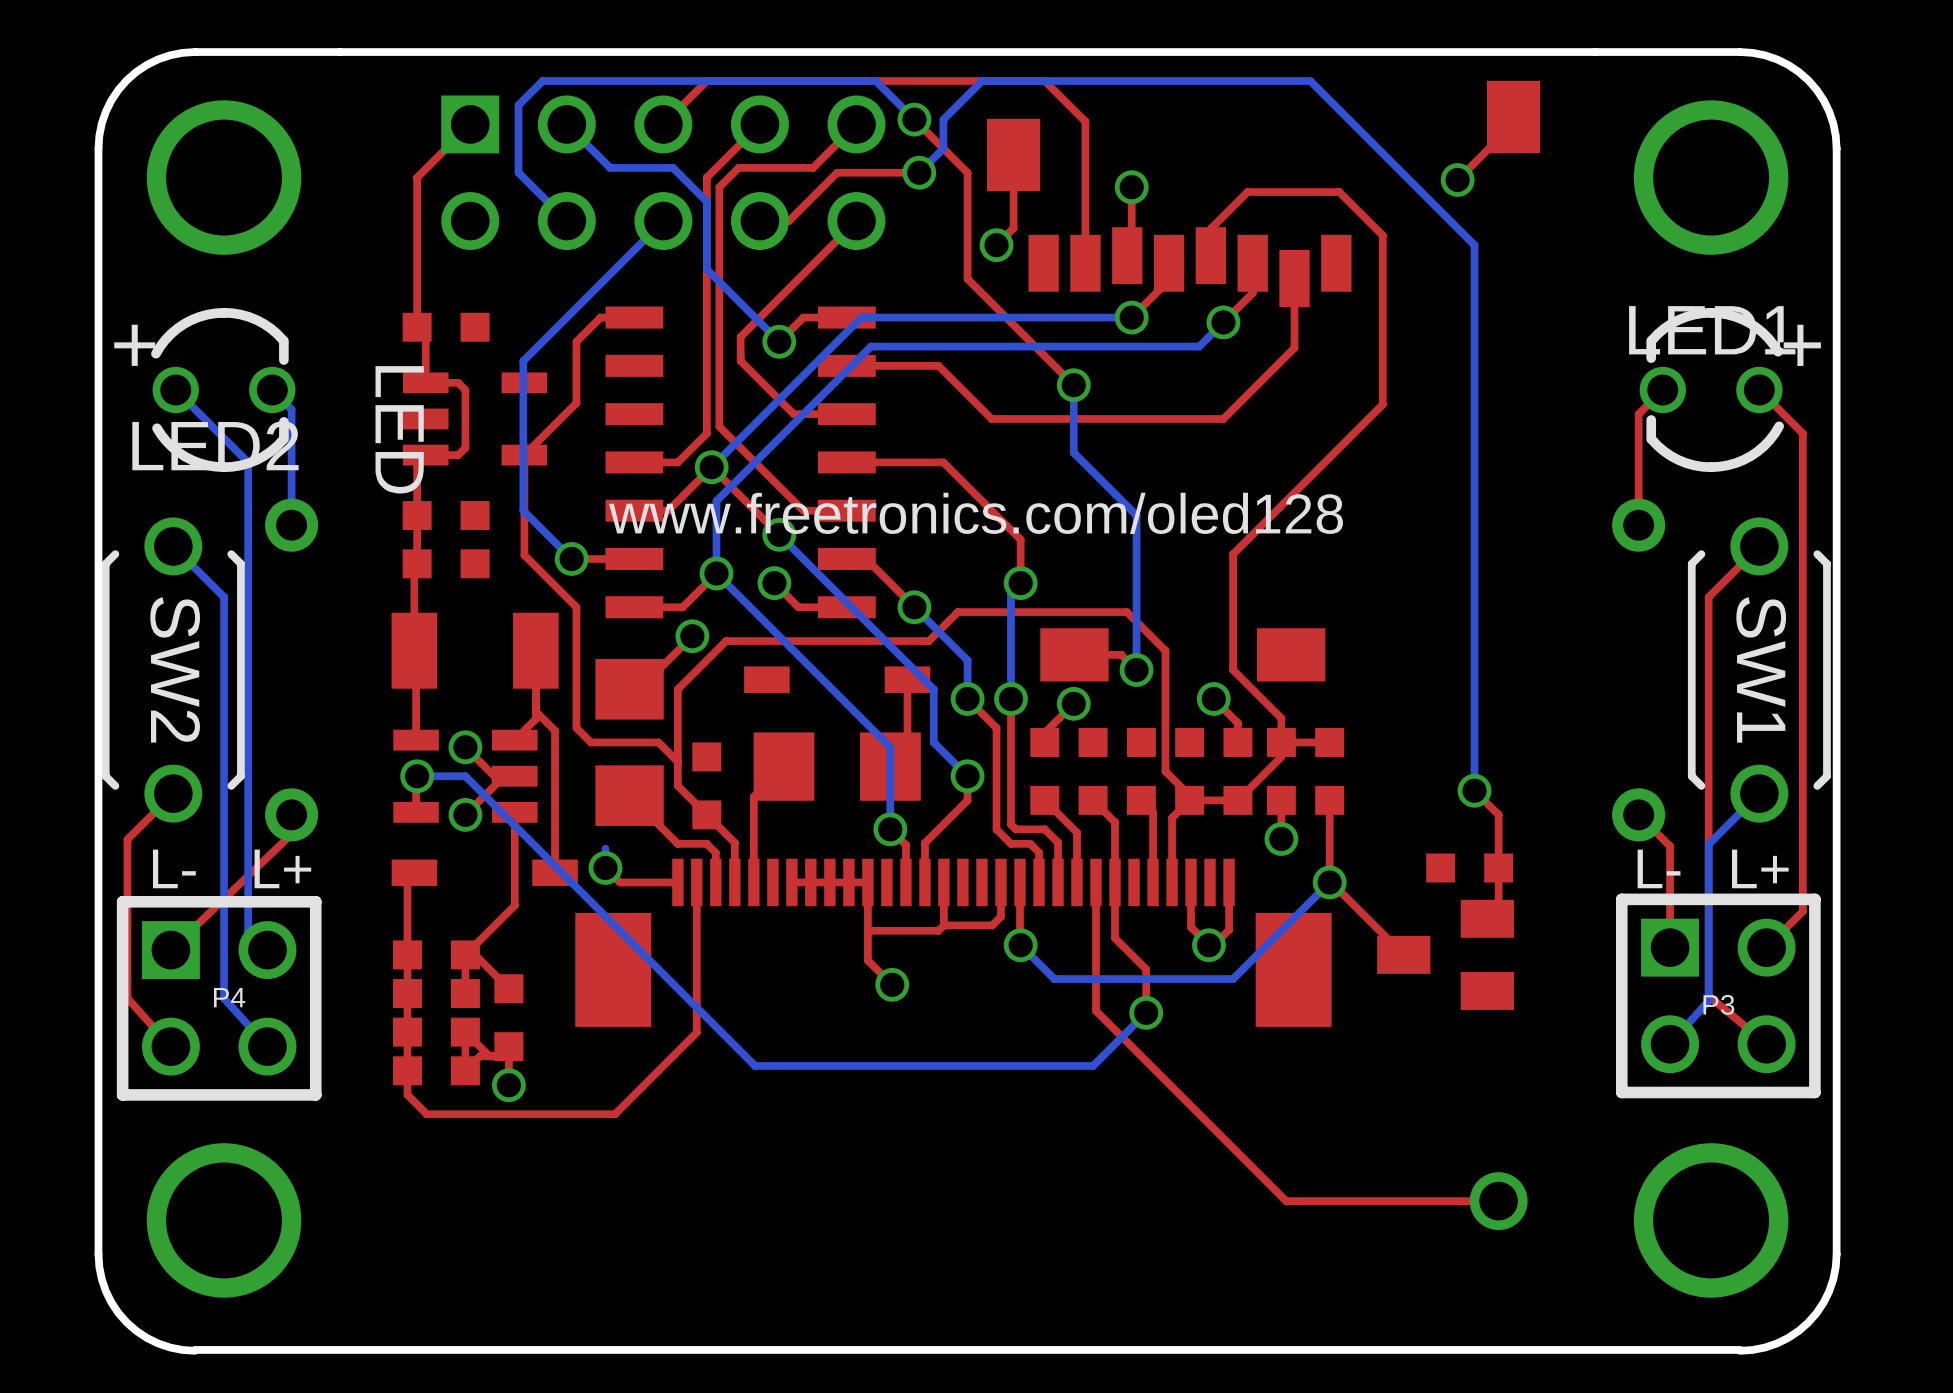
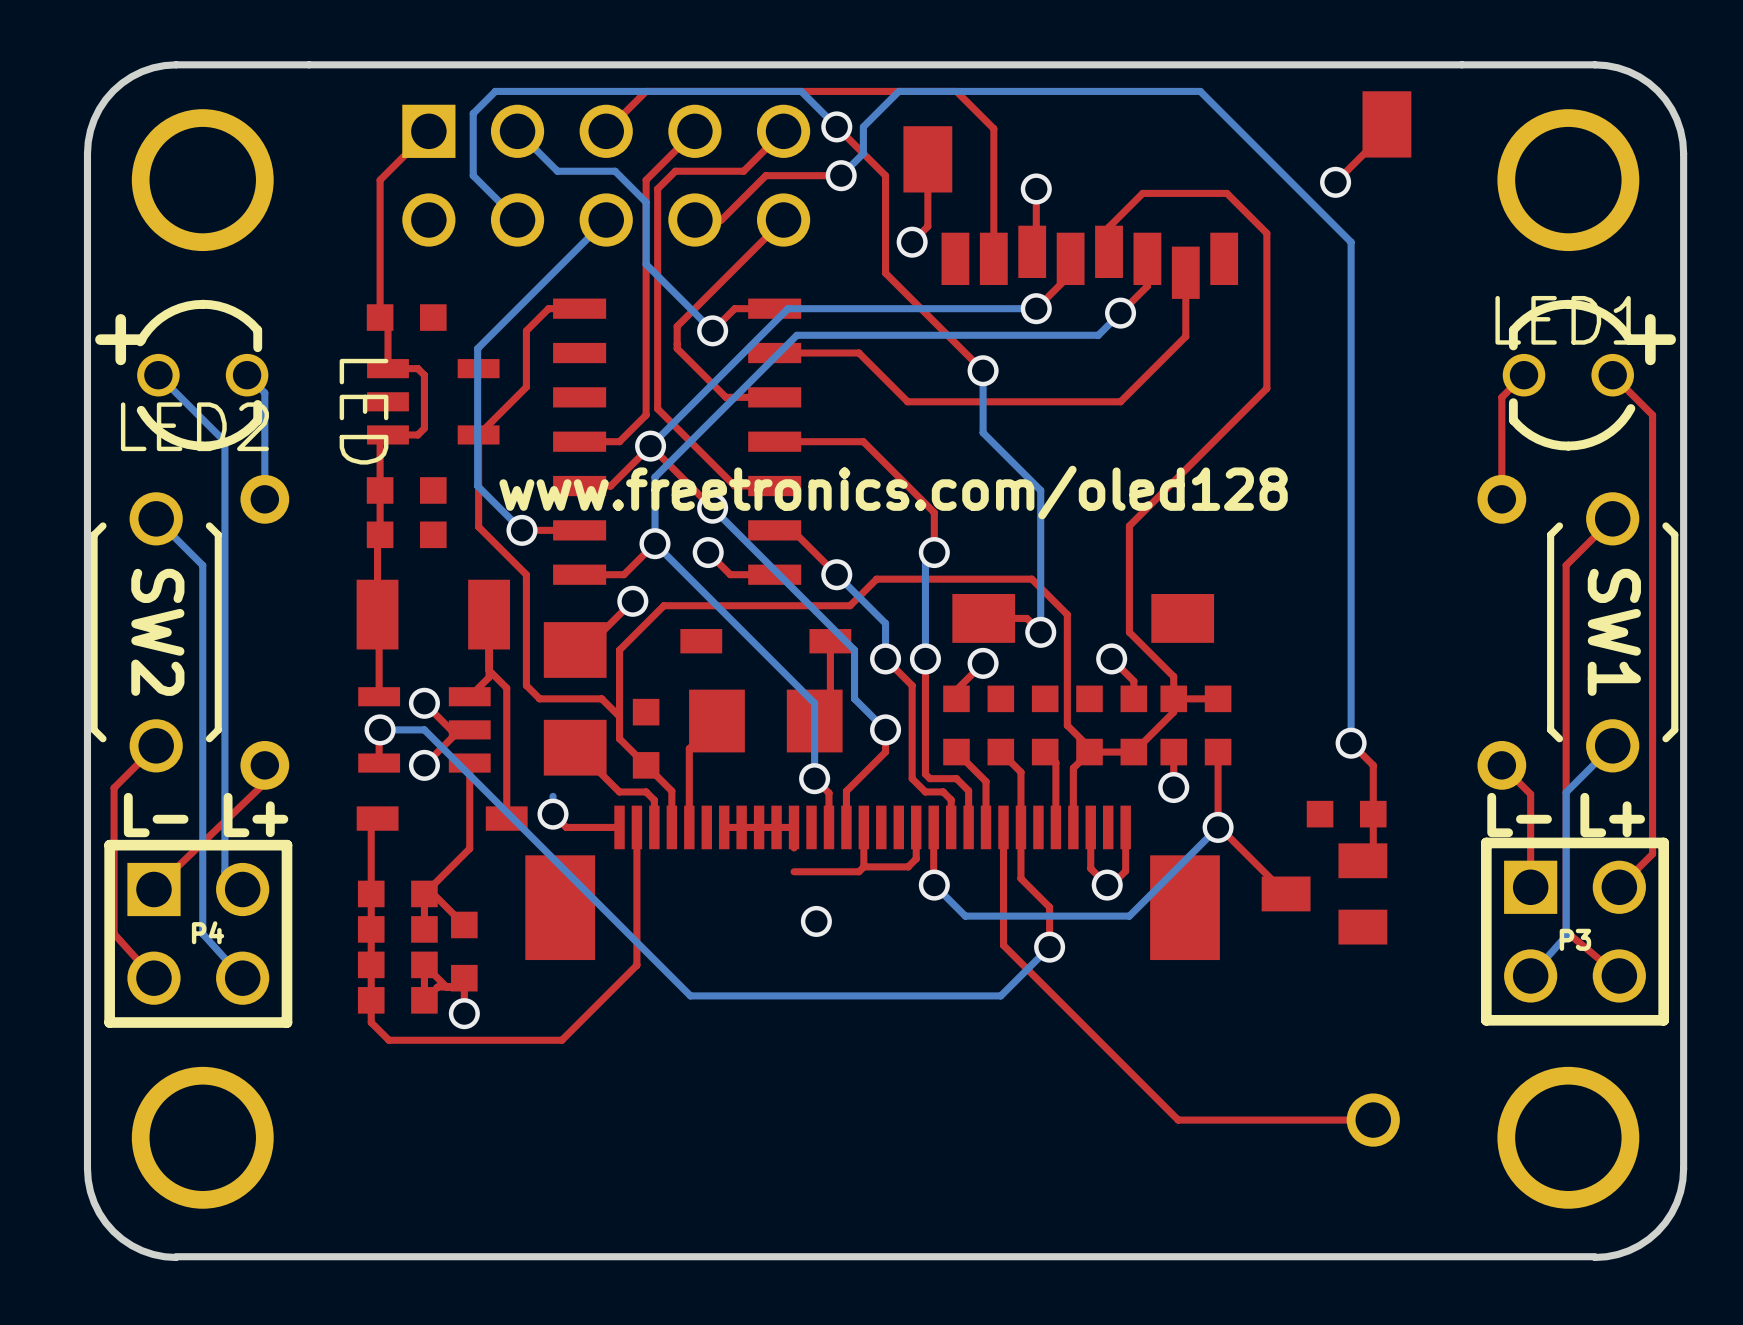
top track: (867, 904) (867, 960) (892, 984) -> none

